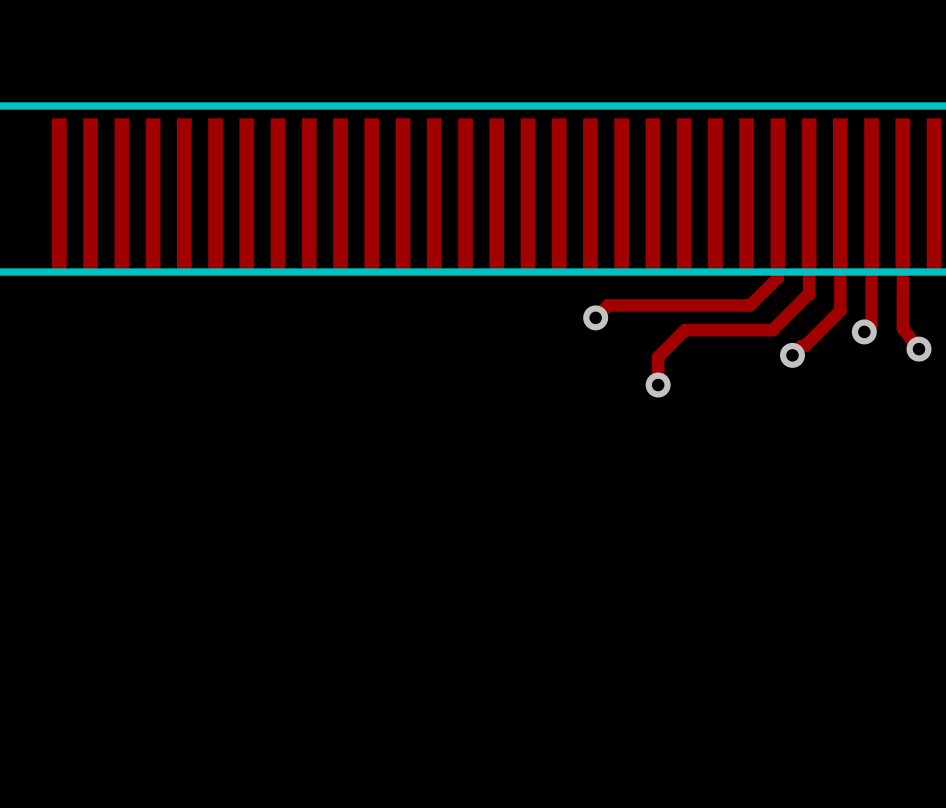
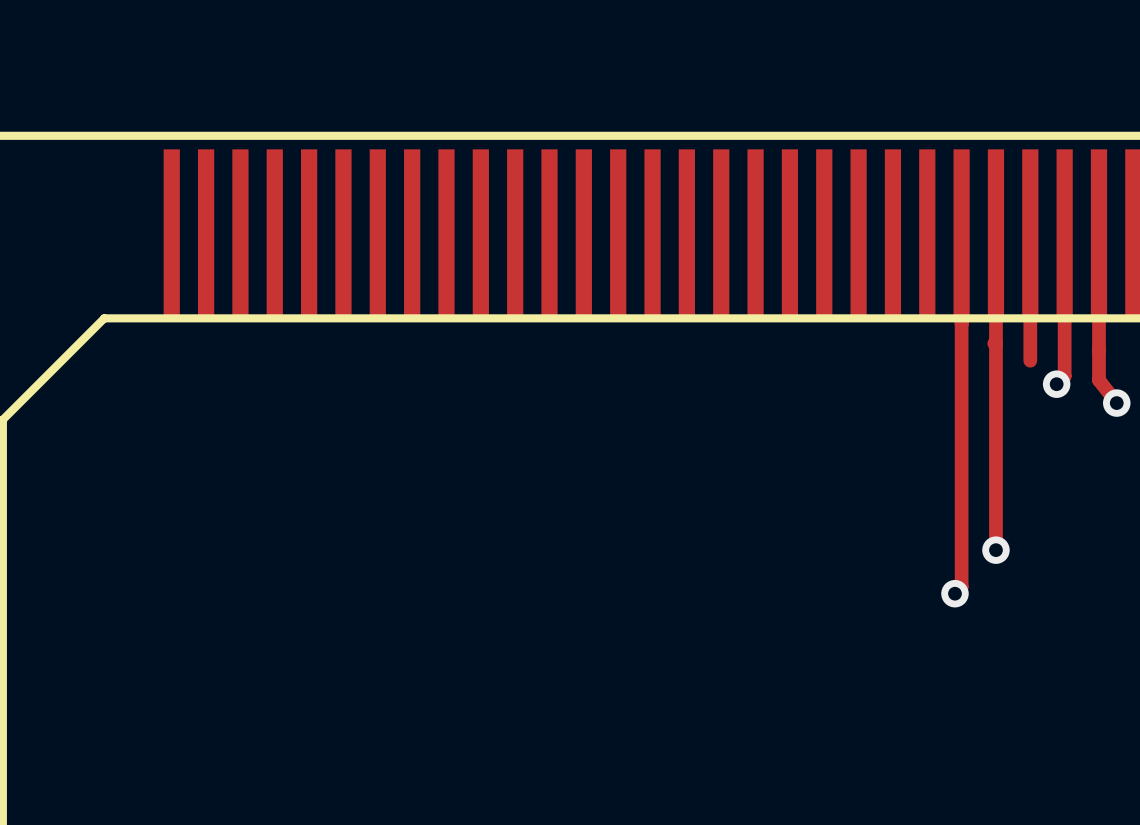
track: (777, 277) (750, 305) (608, 305) (595, 317) -> (961, 324) (961, 587) (954, 593)
track: (807, 294) (772, 330) (684, 330) (658, 356) (658, 385) -> (995, 343) (995, 550)
track: (840, 310) (804, 345) (801, 345) (792, 355) -> none
via: (595, 317) -> none
via: (792, 355) -> none
via: (658, 385) -> none
via: none -> (995, 550)
via: none -> (954, 593)

